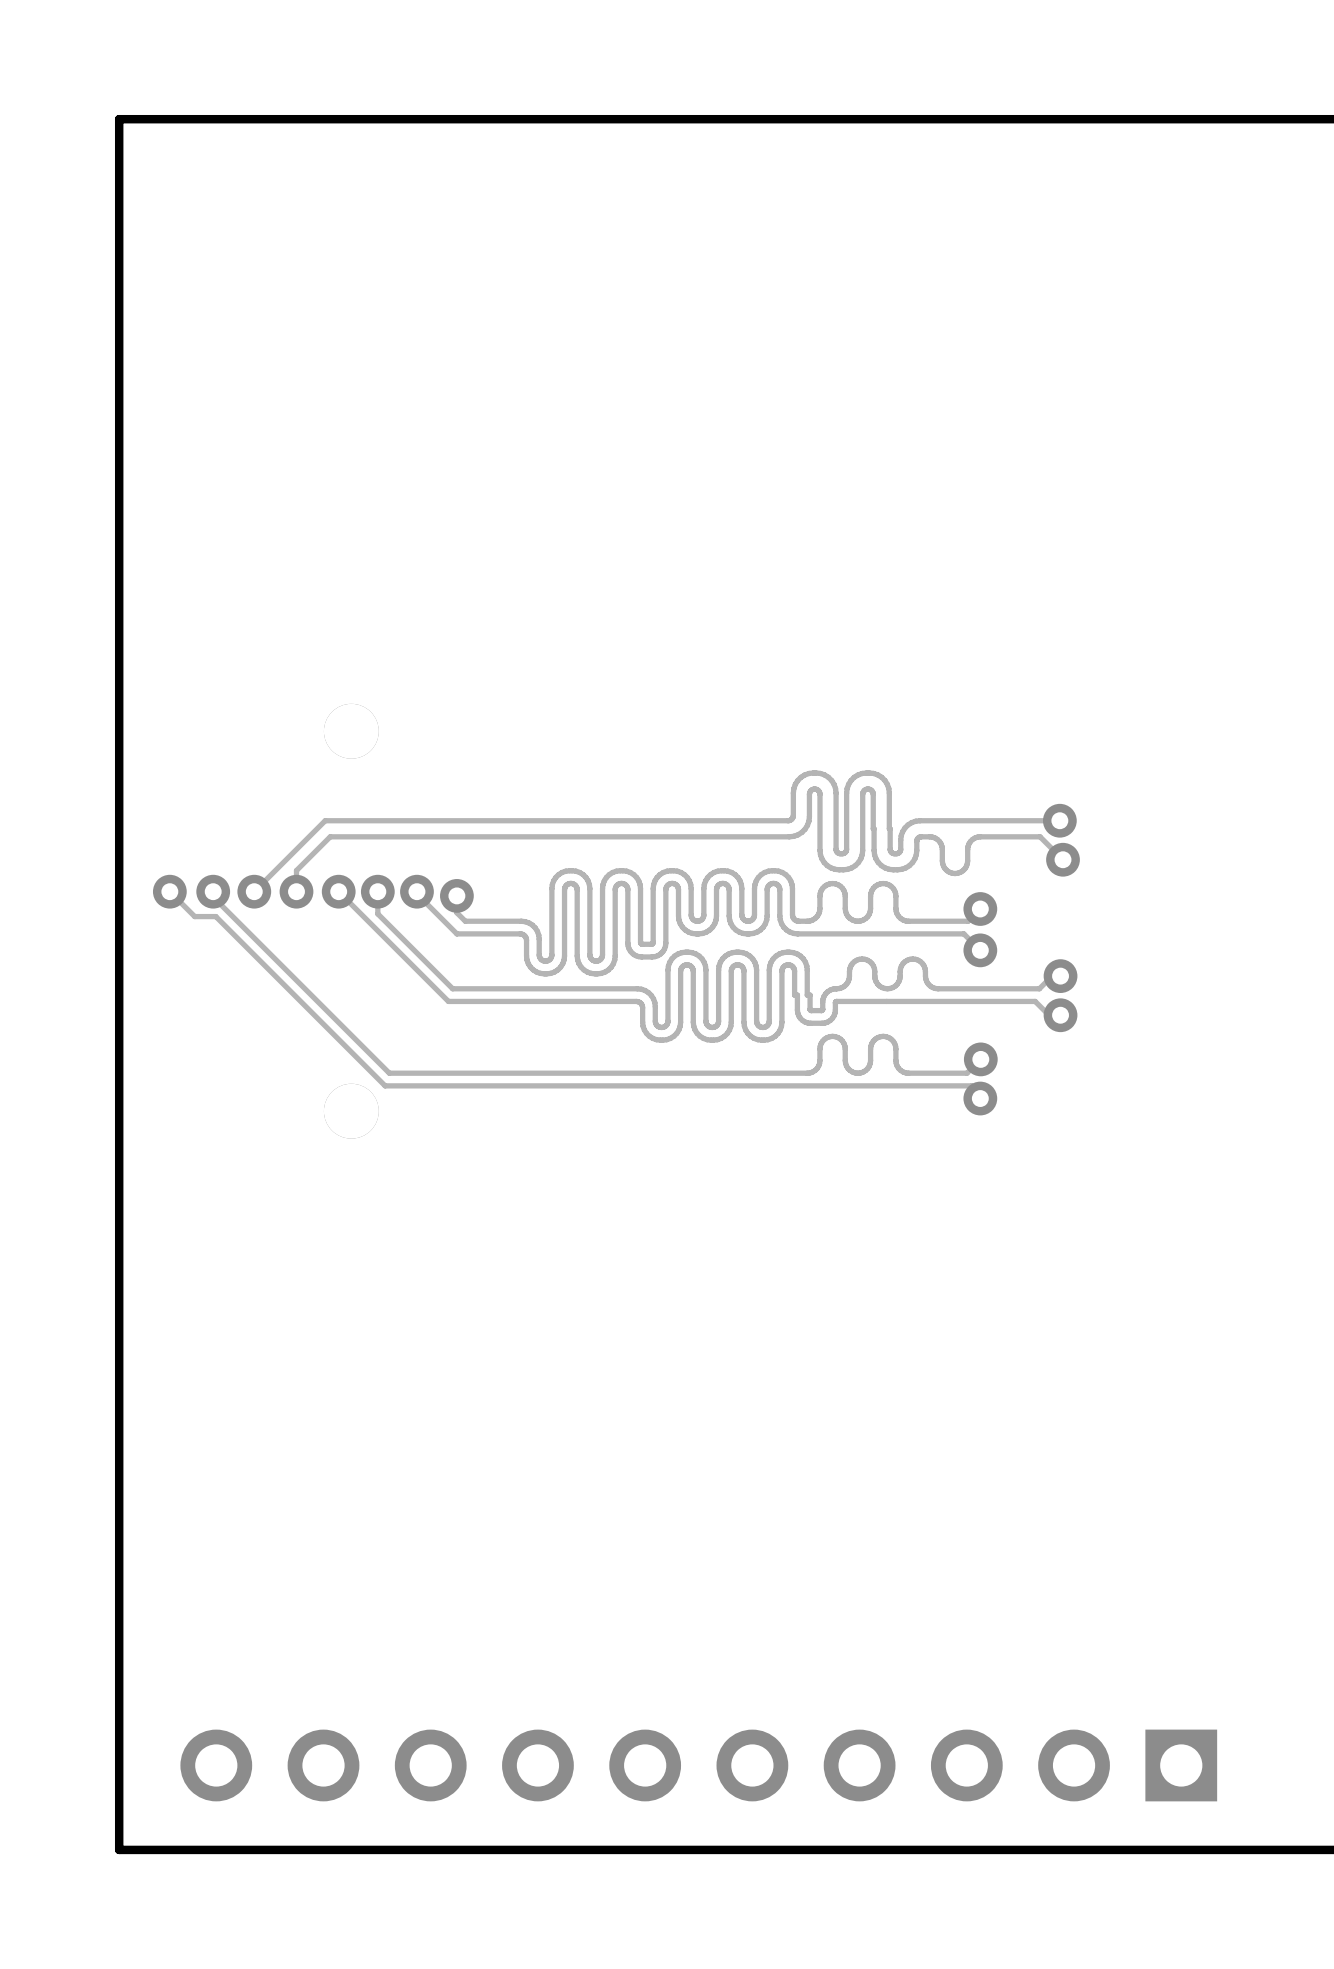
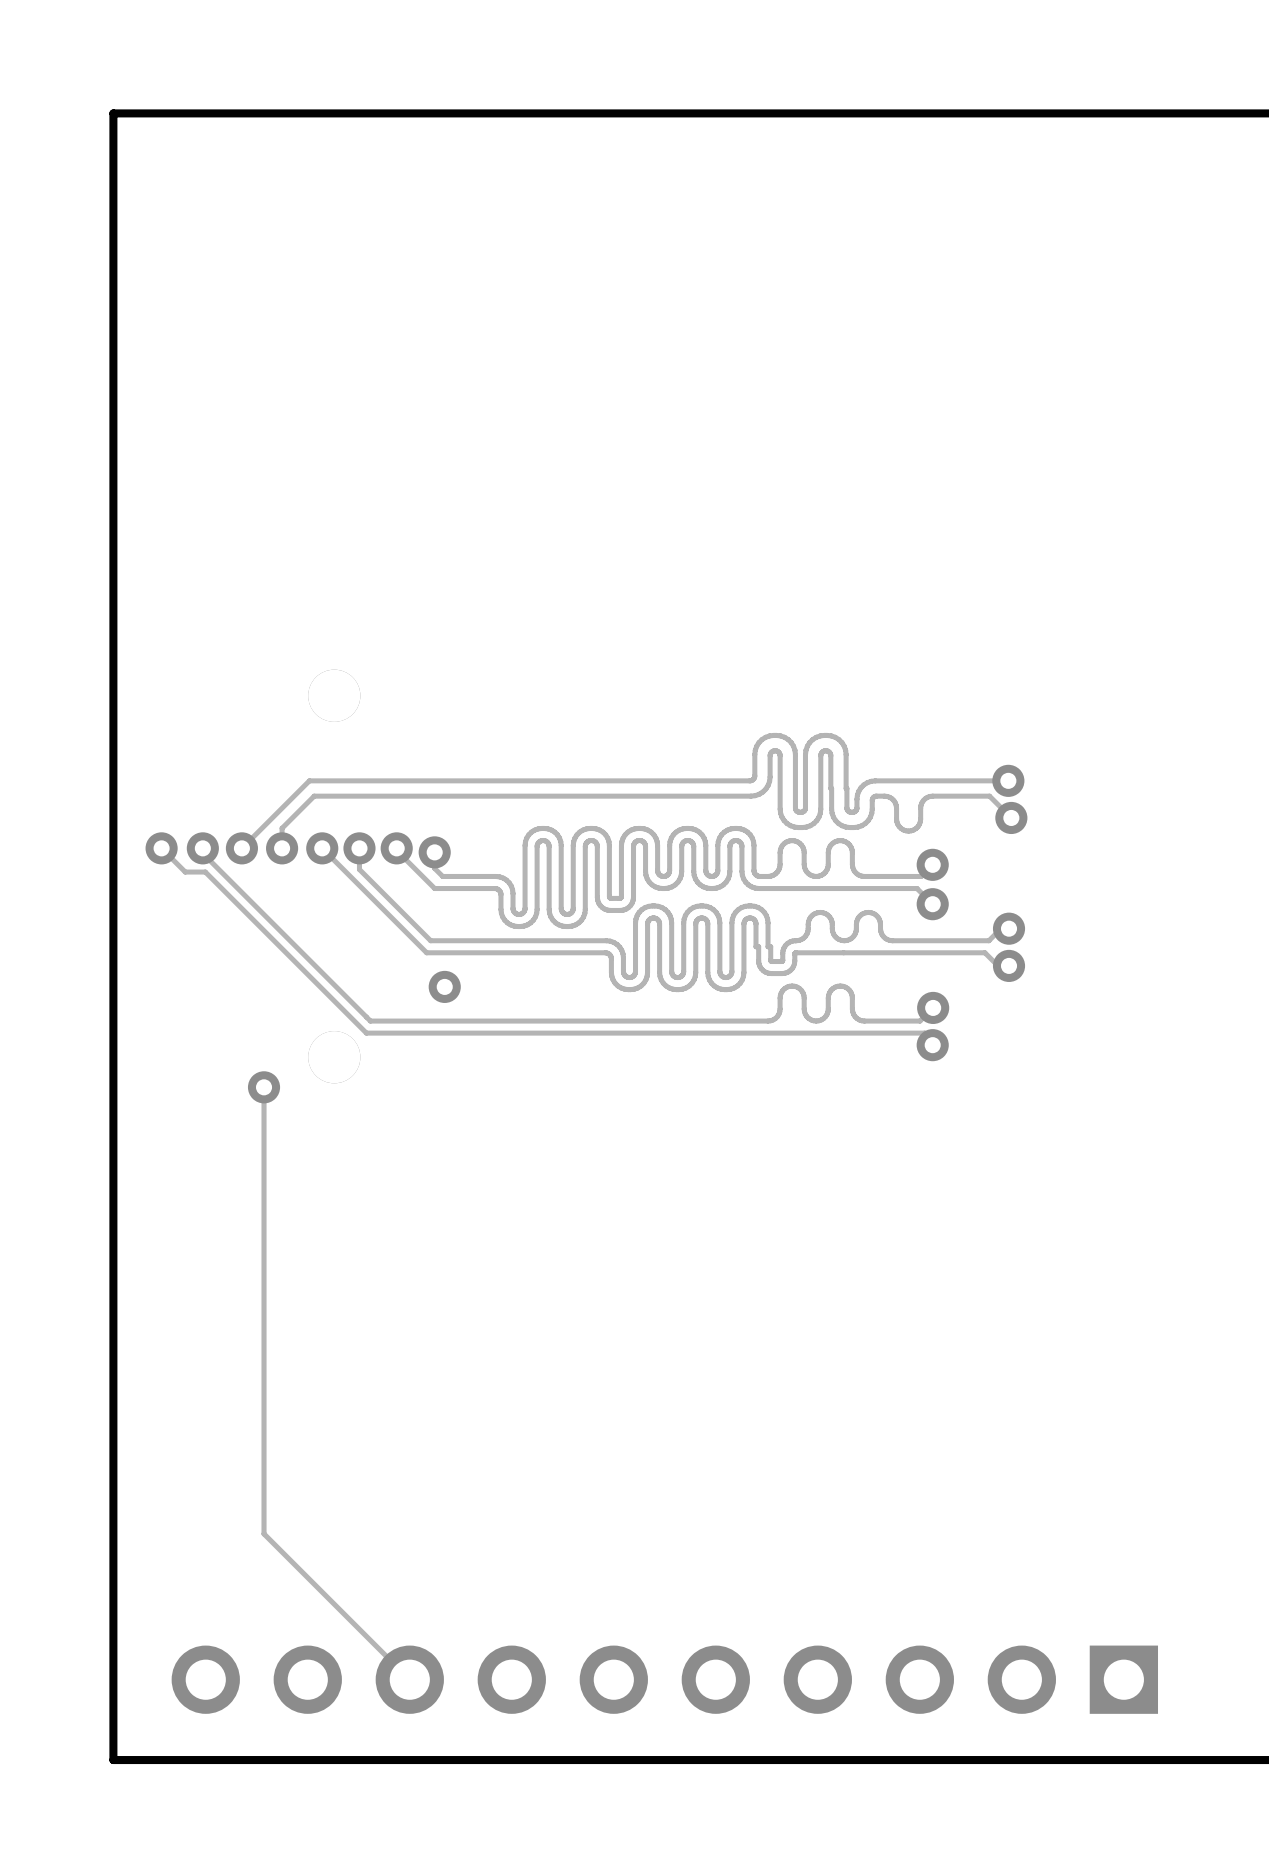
via: none -> (444, 986)
track: none -> (264, 1087) (264, 1533) (409, 1679)
via: none -> (264, 1087)

